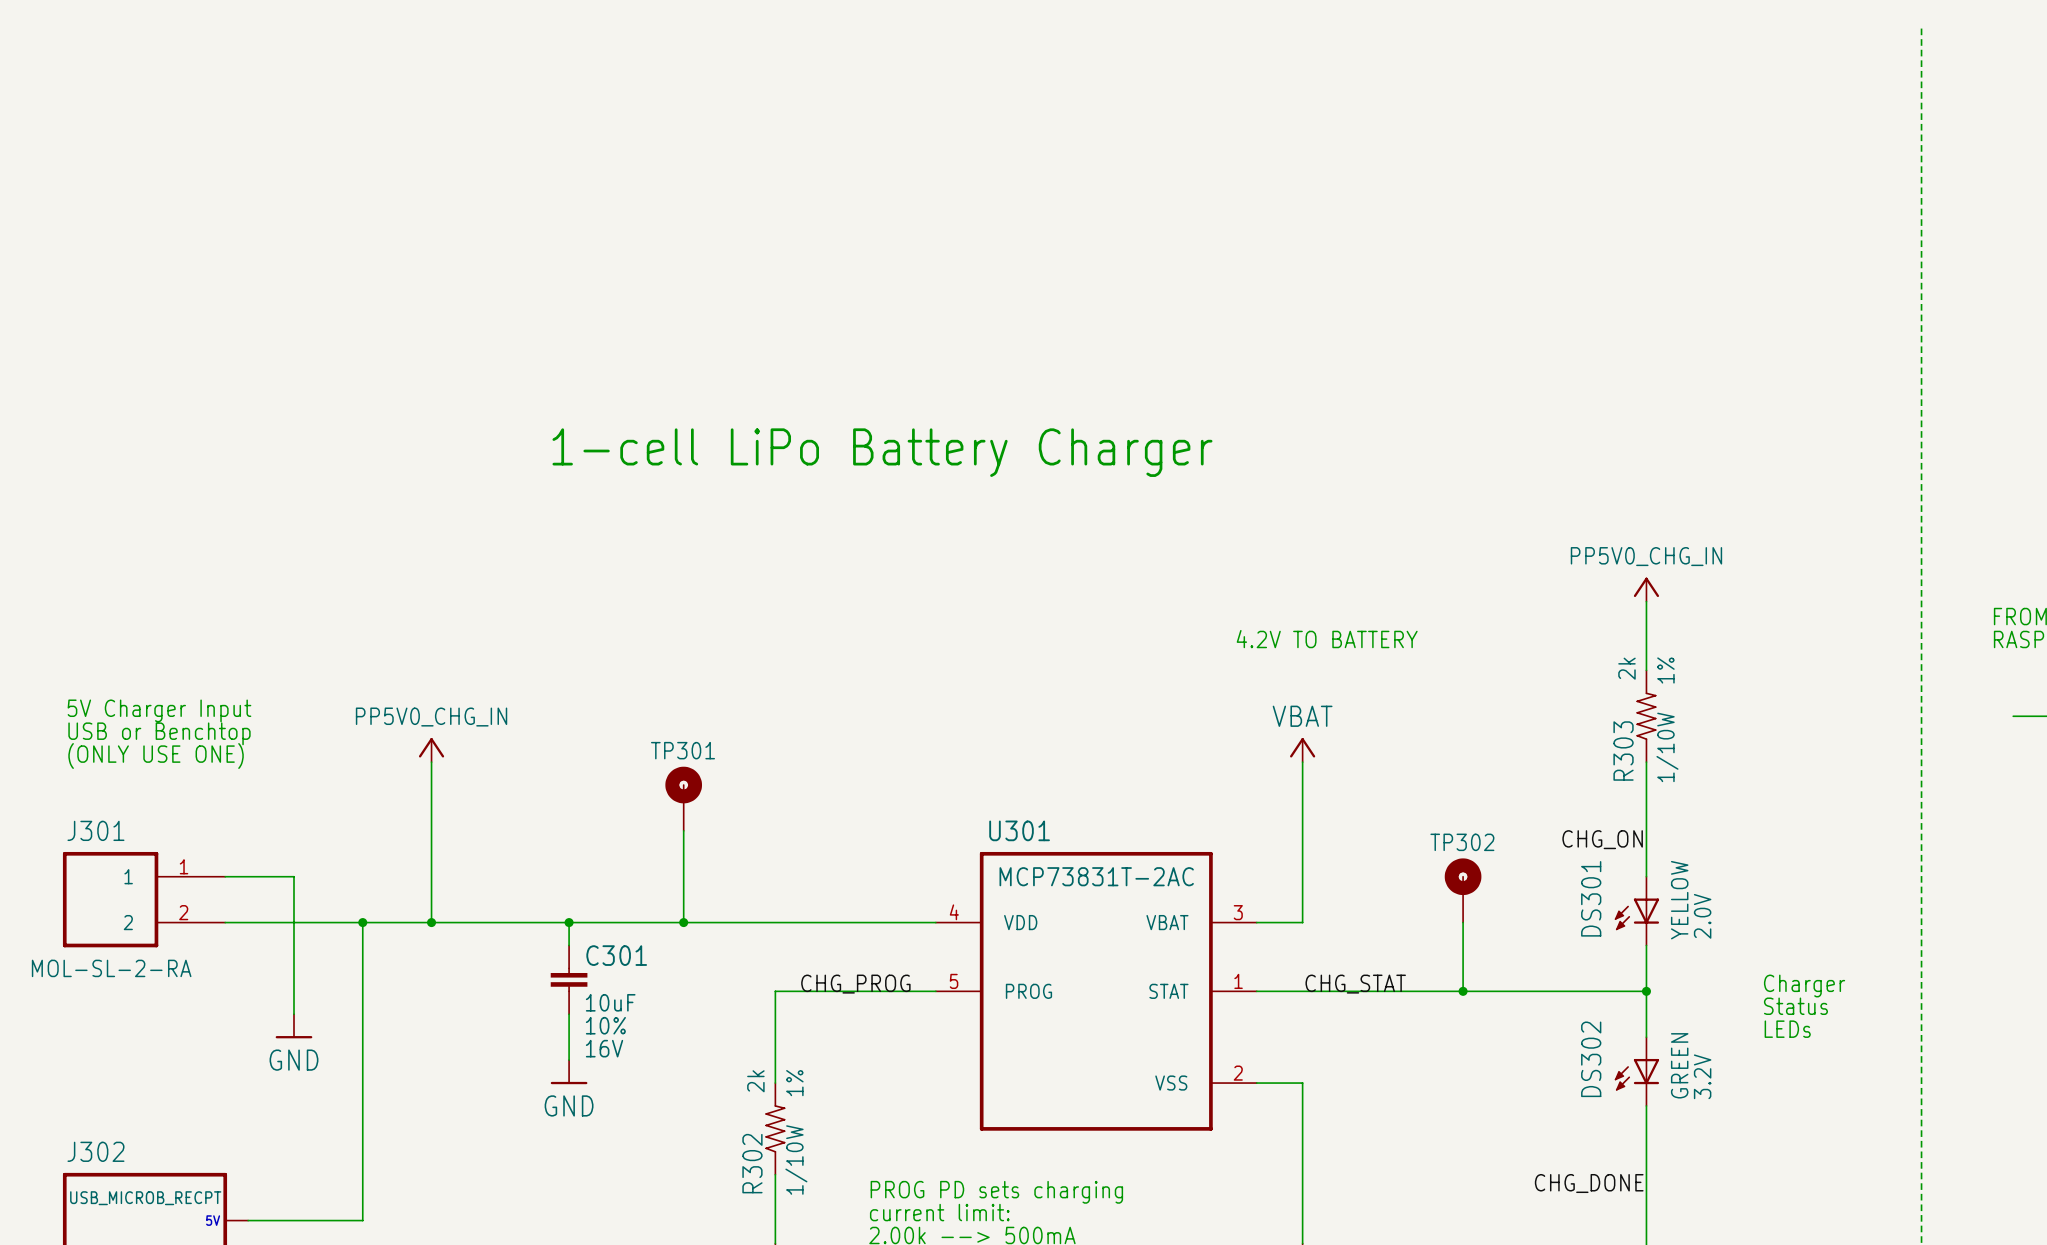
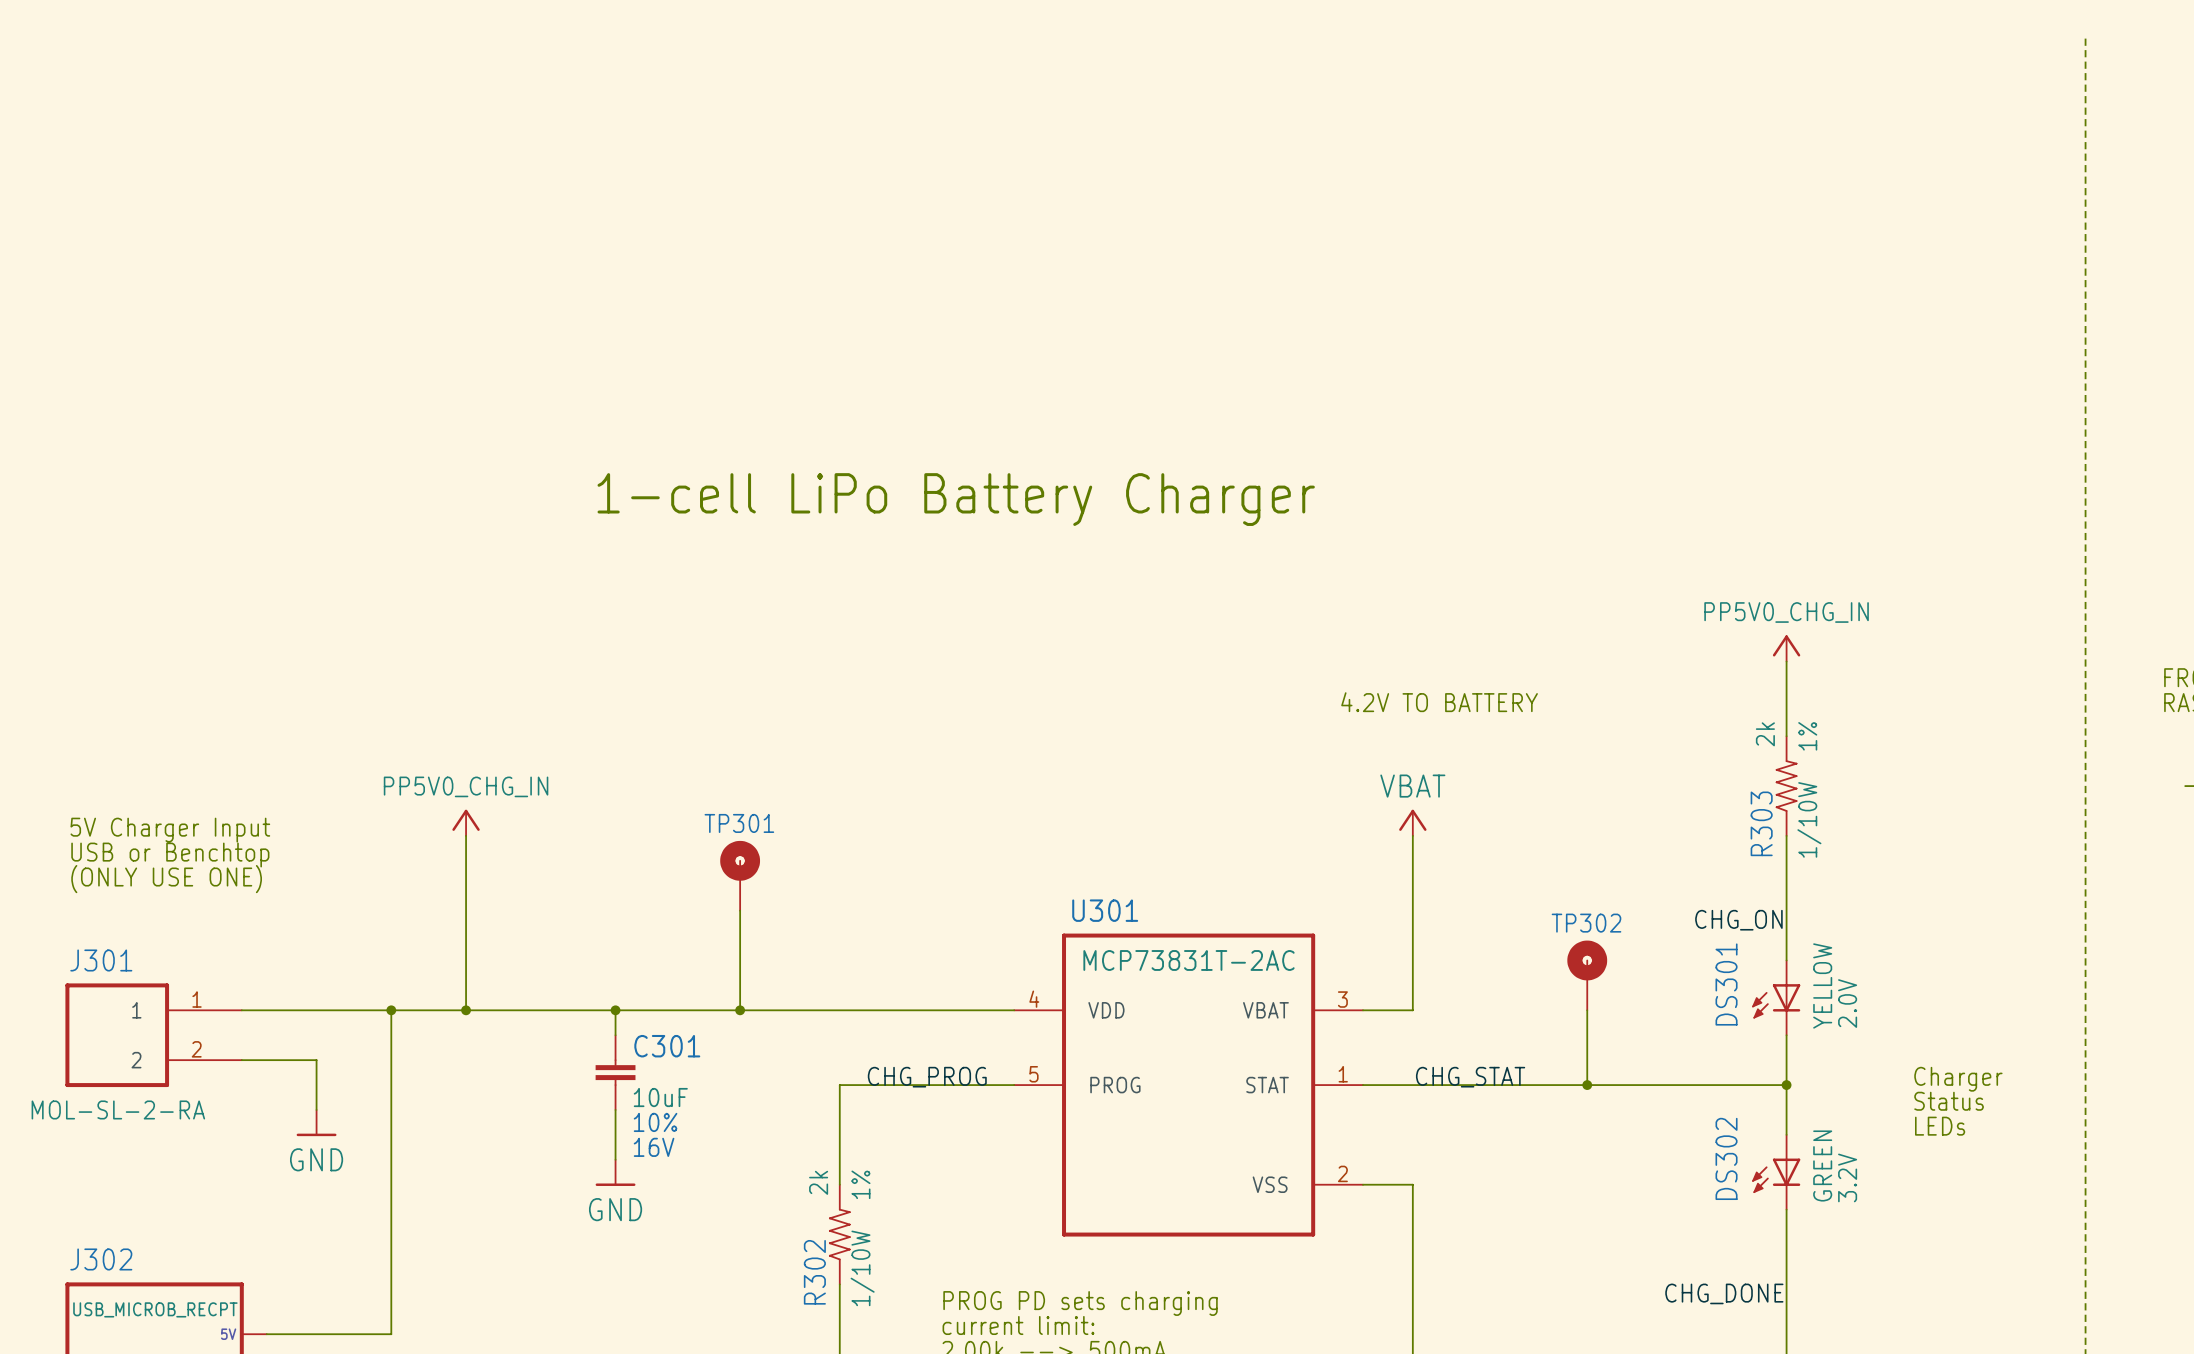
text: 5V Charger Input (159, 710) -> none
text position: USB or Benchtop (159, 733) -> USB or Benchtop (170, 855)
text: (ONLY USE ONE) (156, 756) -> 5V Charger Input (170, 830)
text: none -> (ONLY USE ONE) (166, 879)
wire: (225, 876) (293, 876) (293, 968) -> (241, 1060) (316, 1060)
J301 position: (144, 899) -> (153, 1035)

